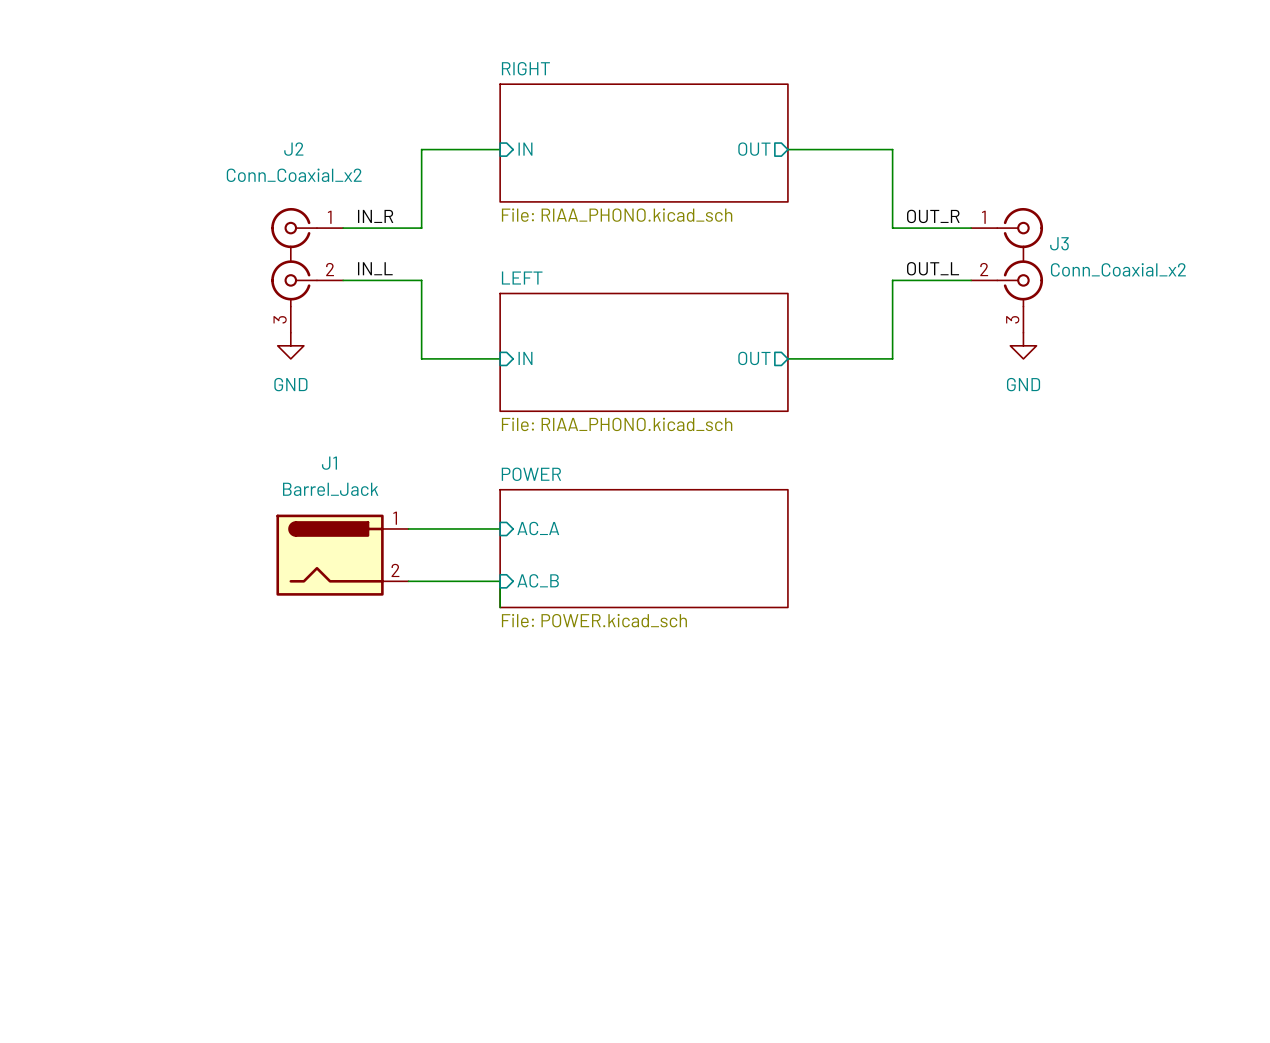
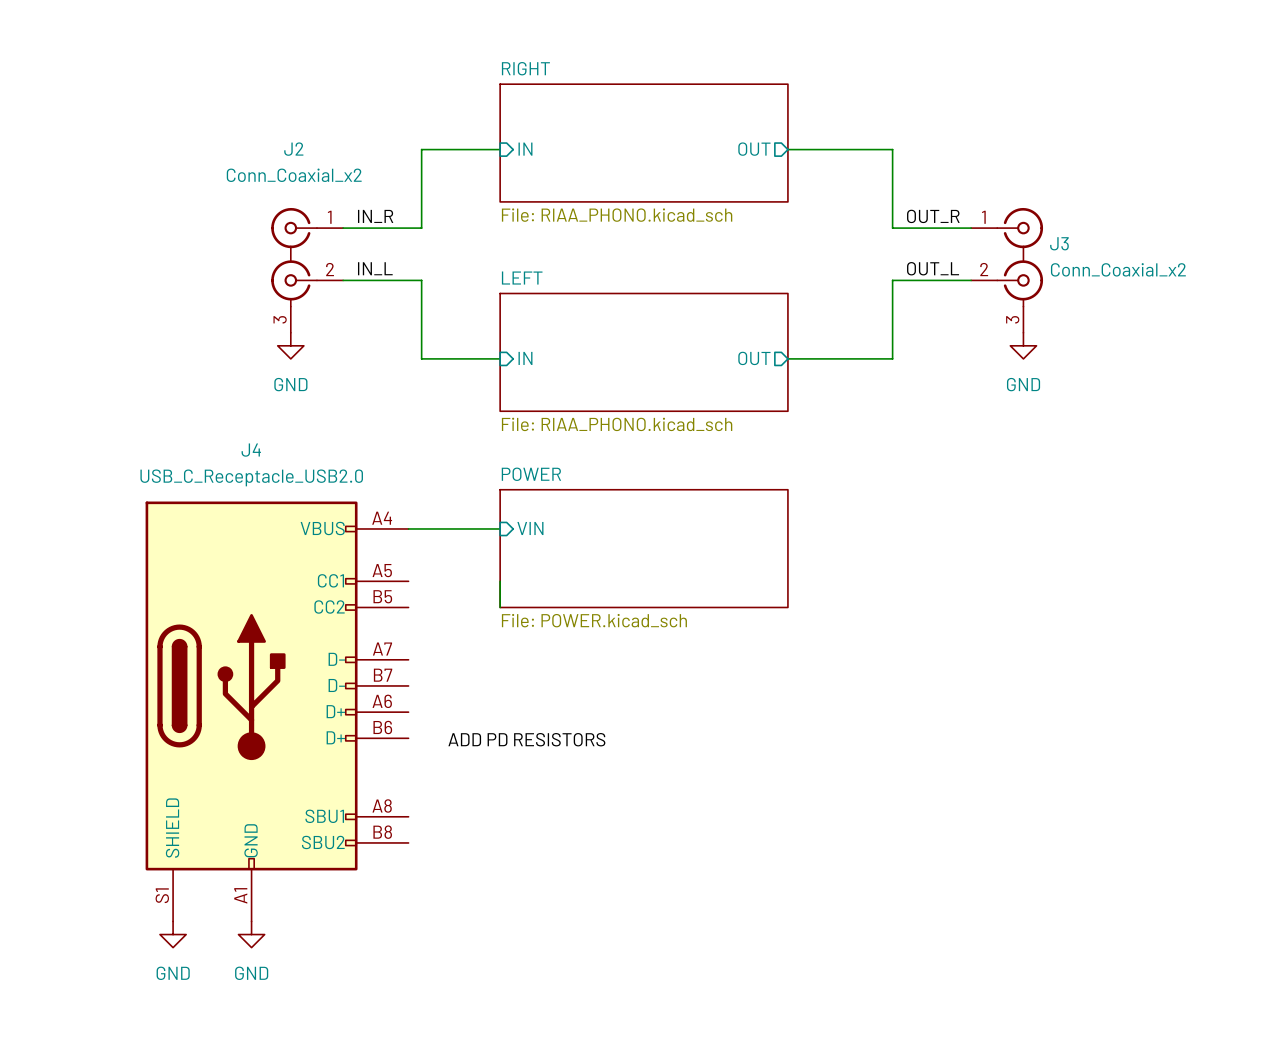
sheet pin: AC_A (538, 528) -> VIN (530, 528)
J1: Barrel_Jack (342, 555) -> none
sheet pin: AC_B (538, 580) -> none
wire: (408, 581) (500, 581) -> none
J4: none -> USB_C_Receptacle_USB2.0 (277, 711)
label: none -> ADD PD RESISTORS (526, 739)
power symbol: none -> GND (173, 934)
power symbol: none -> GND (251, 934)

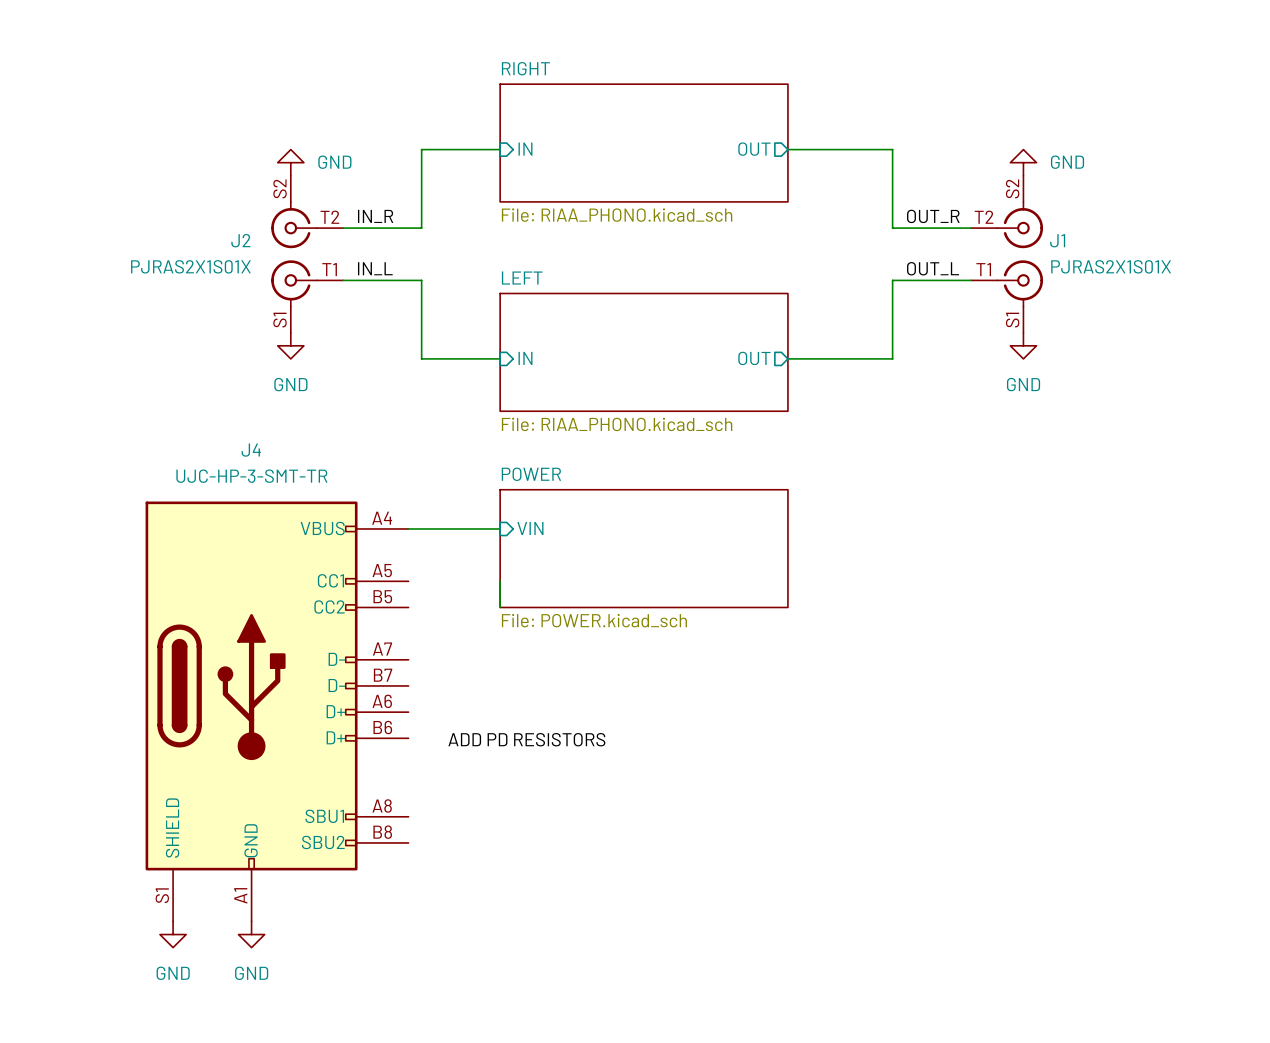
J2 name position: J2 (293, 149) -> J2 (240, 240)
power symbol: none -> GND (290, 162)
power symbol: none -> GND (1023, 162)
J2 value: Conn_Coaxial_x2 (294, 175) -> PJRAS2X1S01X (190, 266)
J2 symbol: [271, 207, 344, 333] -> [271, 175, 344, 333]
J1: none -> PJRAS2X1S01X (1007, 254)
J3: Conn_Coaxial_x2 (1007, 270) -> none
J4 value: USB_C_Receptacle_USB2.0 (251, 477) -> UJC-HP-3-SMT-TR (251, 476)

